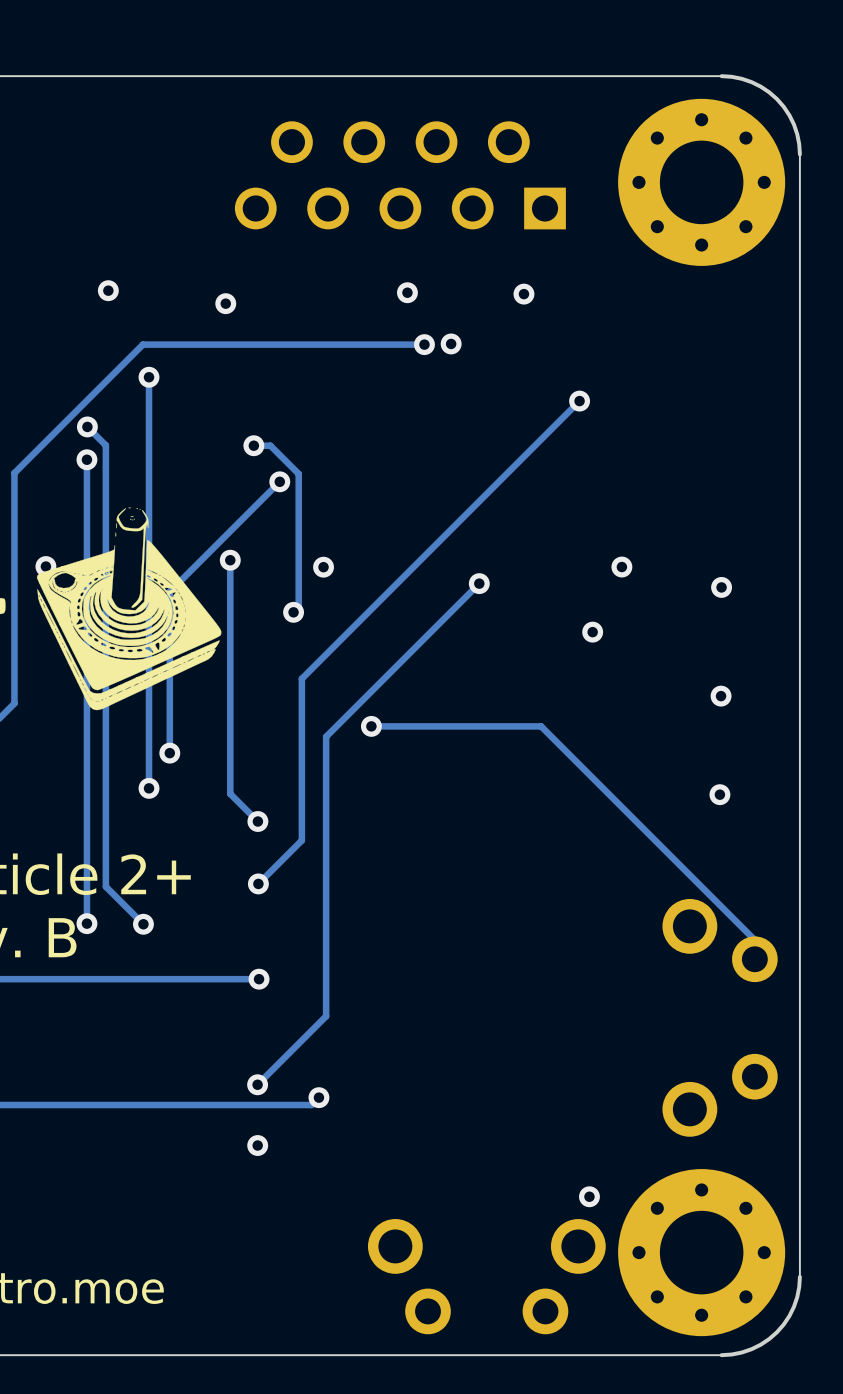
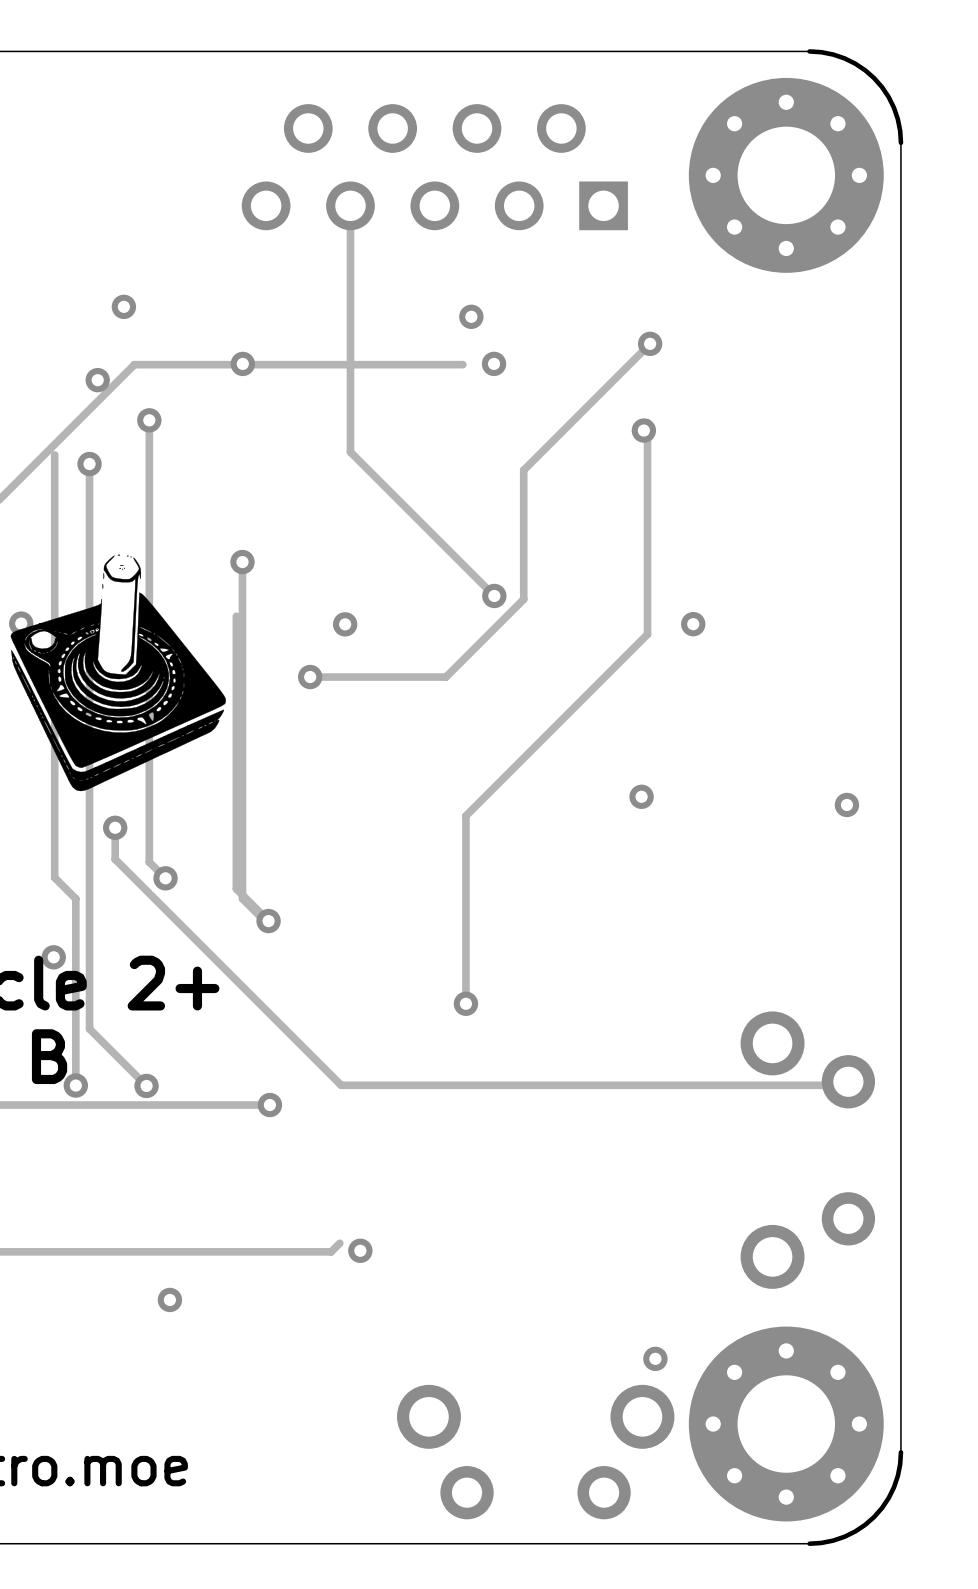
track: none -> (350, 205) (350, 452) (494, 595)
via position: (108, 290) -> (123, 306)
via: (407, 292) -> none
via: (523, 294) -> none
via position: (225, 303) -> (242, 363)
via: none -> (471, 316)
track: none -> (650, 343) (523, 470) (523, 599) (446, 677) (314, 677)
via: none -> (650, 343)
via: (424, 344) -> none
via: none -> (97, 380)
track: (149, 377) (149, 788) -> none
via position: (149, 377) -> (149, 420)
track: none -> (149, 420) (149, 862) (165, 878)
track: none -> (647, 422) (647, 634) (465, 815) (465, 1003)
track: (579, 401) (301, 678) (301, 840) (258, 883) -> none
track: none -> (54, 454) (54, 877) (75, 898) (75, 1085)
track: (87, 426) (105, 445) (105, 886) (143, 924) -> none
via position: (87, 426) -> (89, 464)
track: none -> (89, 464) (89, 1028) (146, 1085)
track: (253, 445) (270, 445) (298, 473) (298, 607) (293, 612) -> none
via: (253, 445) -> none
track: (86, 459) (86, 923) -> none
via: (86, 459) -> none
track: (279, 481) (169, 591) (169, 753) -> none
via: (279, 481) -> none
track: none -> (242, 562) (242, 898) (268, 924)
via: none -> (242, 562)
via: (230, 560) -> none
track: (479, 583) (326, 736) (326, 1016) (257, 1084) -> none
via position: (479, 583) -> (494, 595)
via: (721, 587) -> none
via: (592, 632) -> none
via: (721, 696) -> none
via: none -> (641, 796)
via: none -> (846, 804)
track: (371, 726) (541, 726) (754, 940) (754, 959) -> (115, 827) (115, 859) (341, 1085) (844, 1085) (848, 1081)
via: (371, 726) -> none
via: none -> (115, 827)
via: (169, 753) -> none
via position: (149, 788) -> (165, 878)
via: (719, 794) -> none
via: none -> (53, 957)
via: (258, 883) -> none
via: none -> (465, 1003)
via: (86, 923) -> none
via: (143, 924) -> none
via: none -> (75, 1085)
via: none -> (146, 1085)
via: (257, 1084) -> none
via position: (318, 1097) -> (360, 1250)
via: (257, 1145) -> none
via: none -> (169, 1299)

